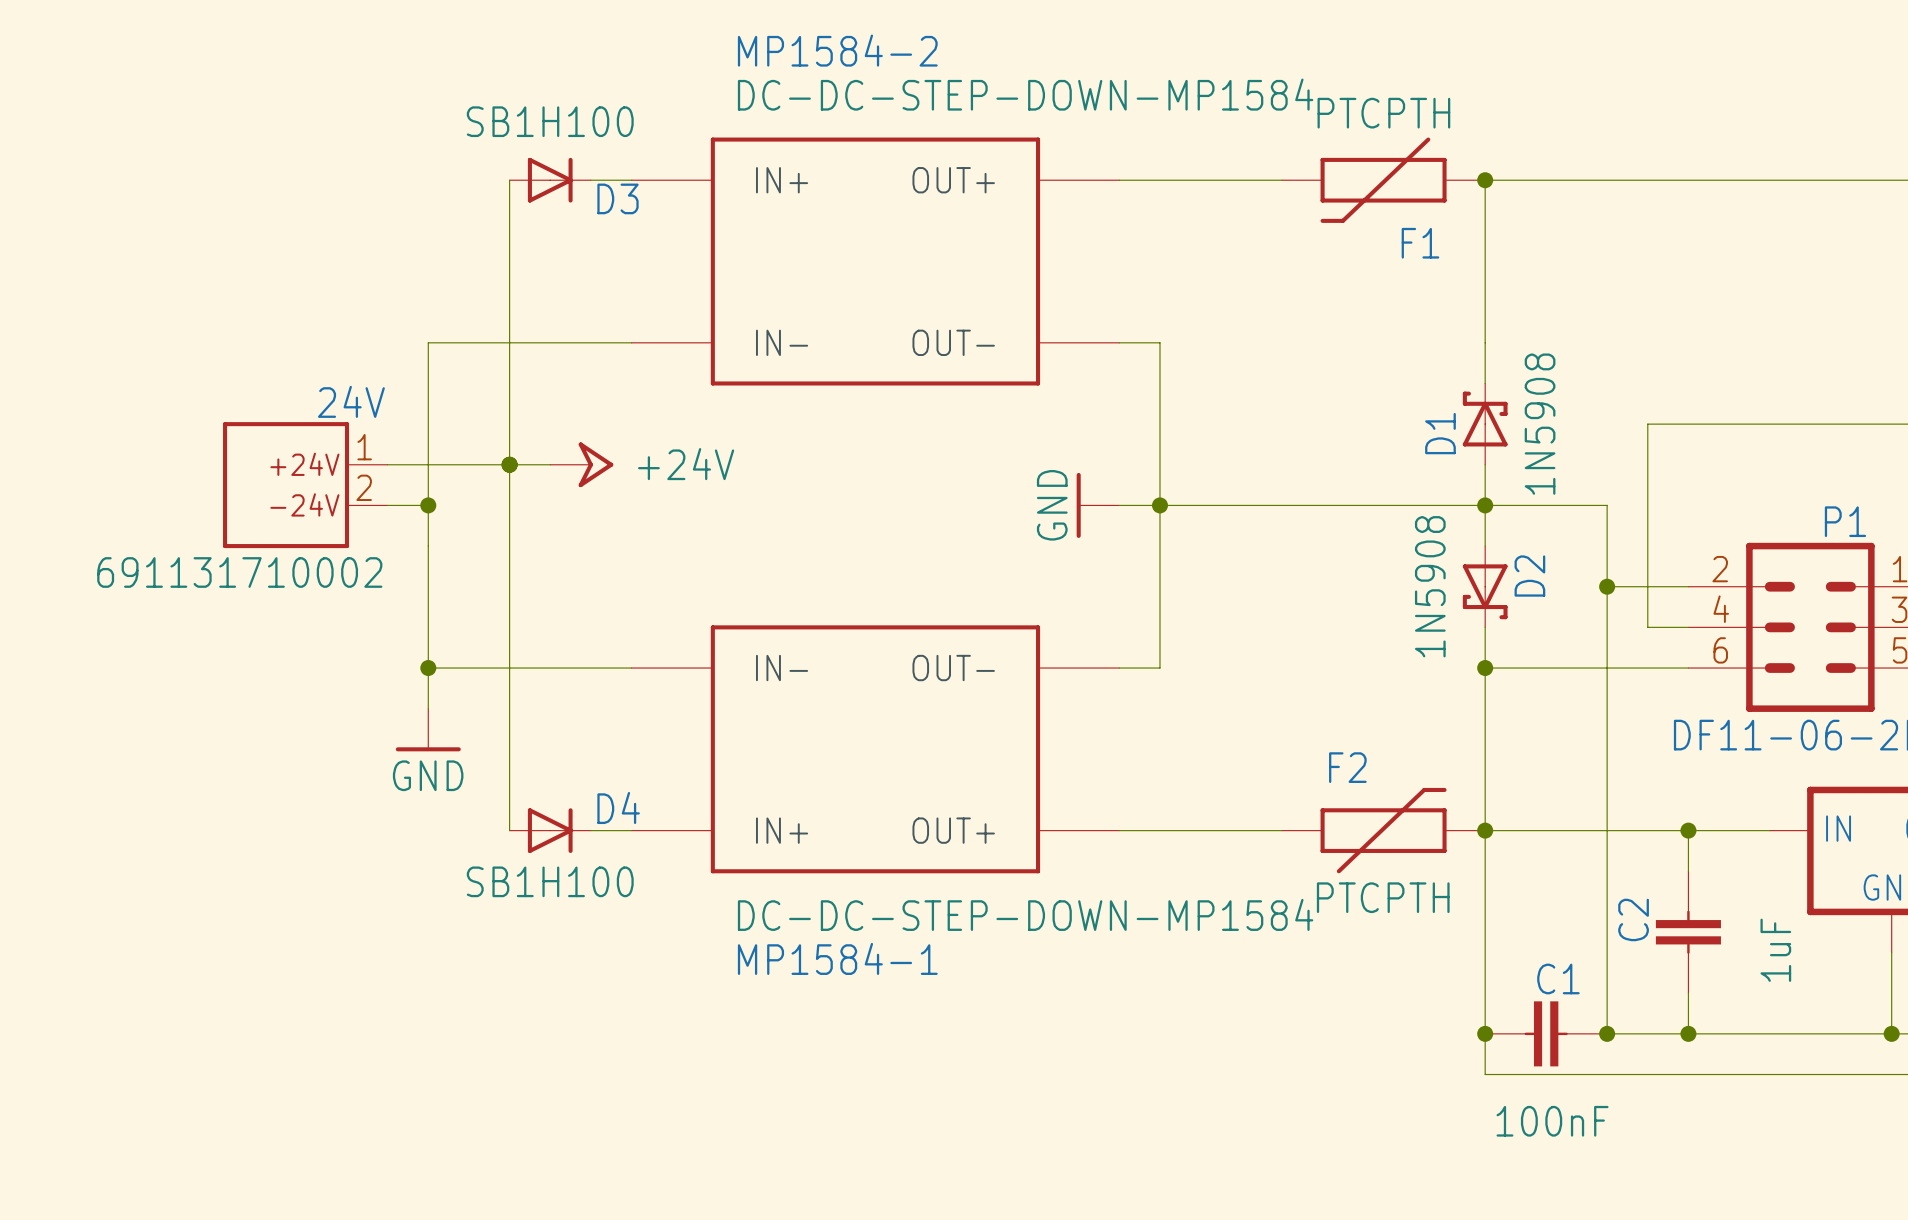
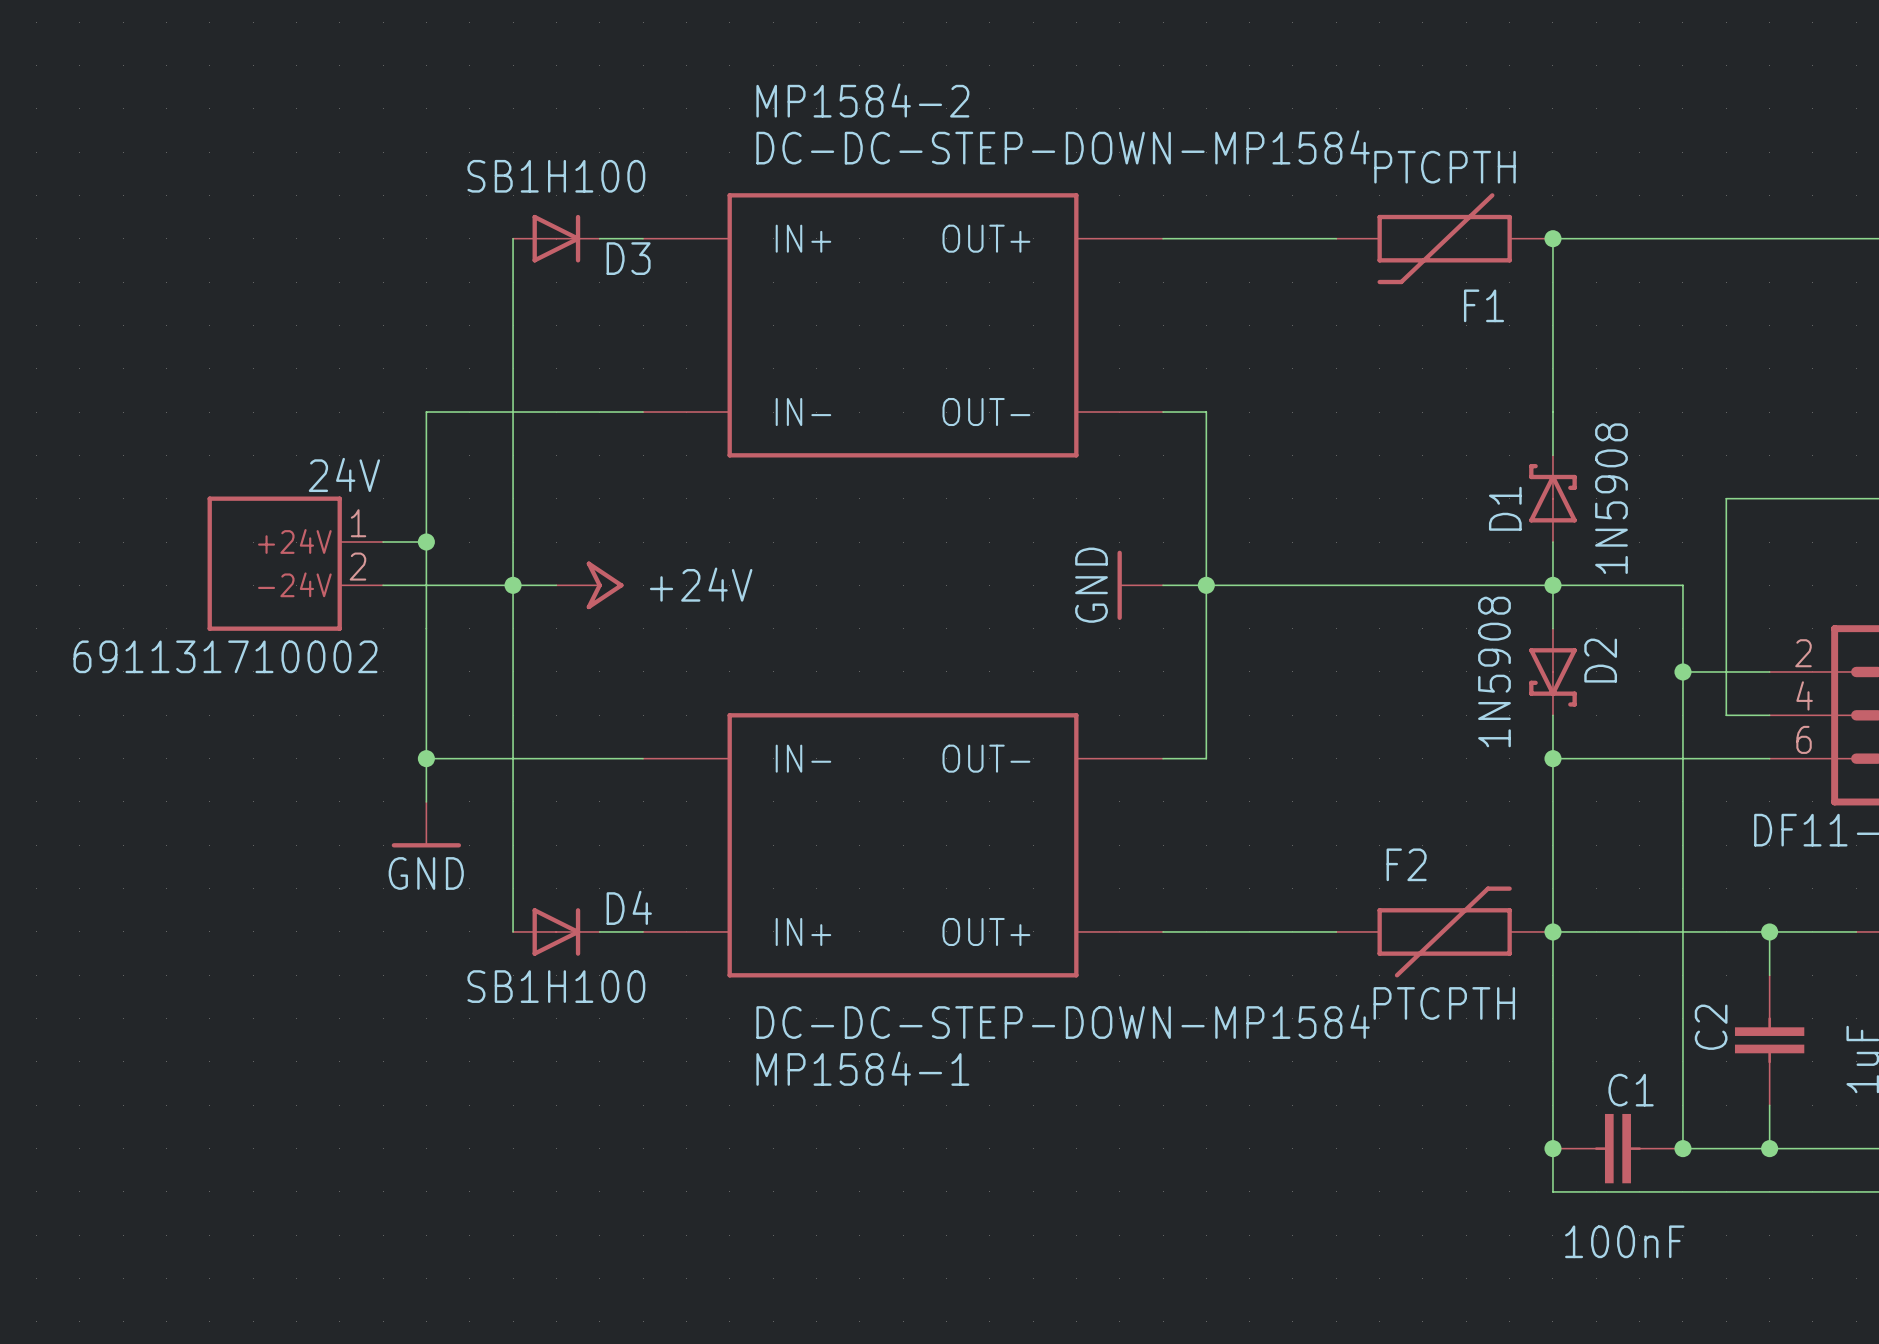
wire: (428, 464) (550, 464) -> (426, 585) (556, 585)
junction: none -> (426, 542)
junction: (509, 464) -> none
power symbol position: +24V (581, 464) -> +24V (589, 585)
junction: (428, 505) -> none
junction: none -> (513, 585)

